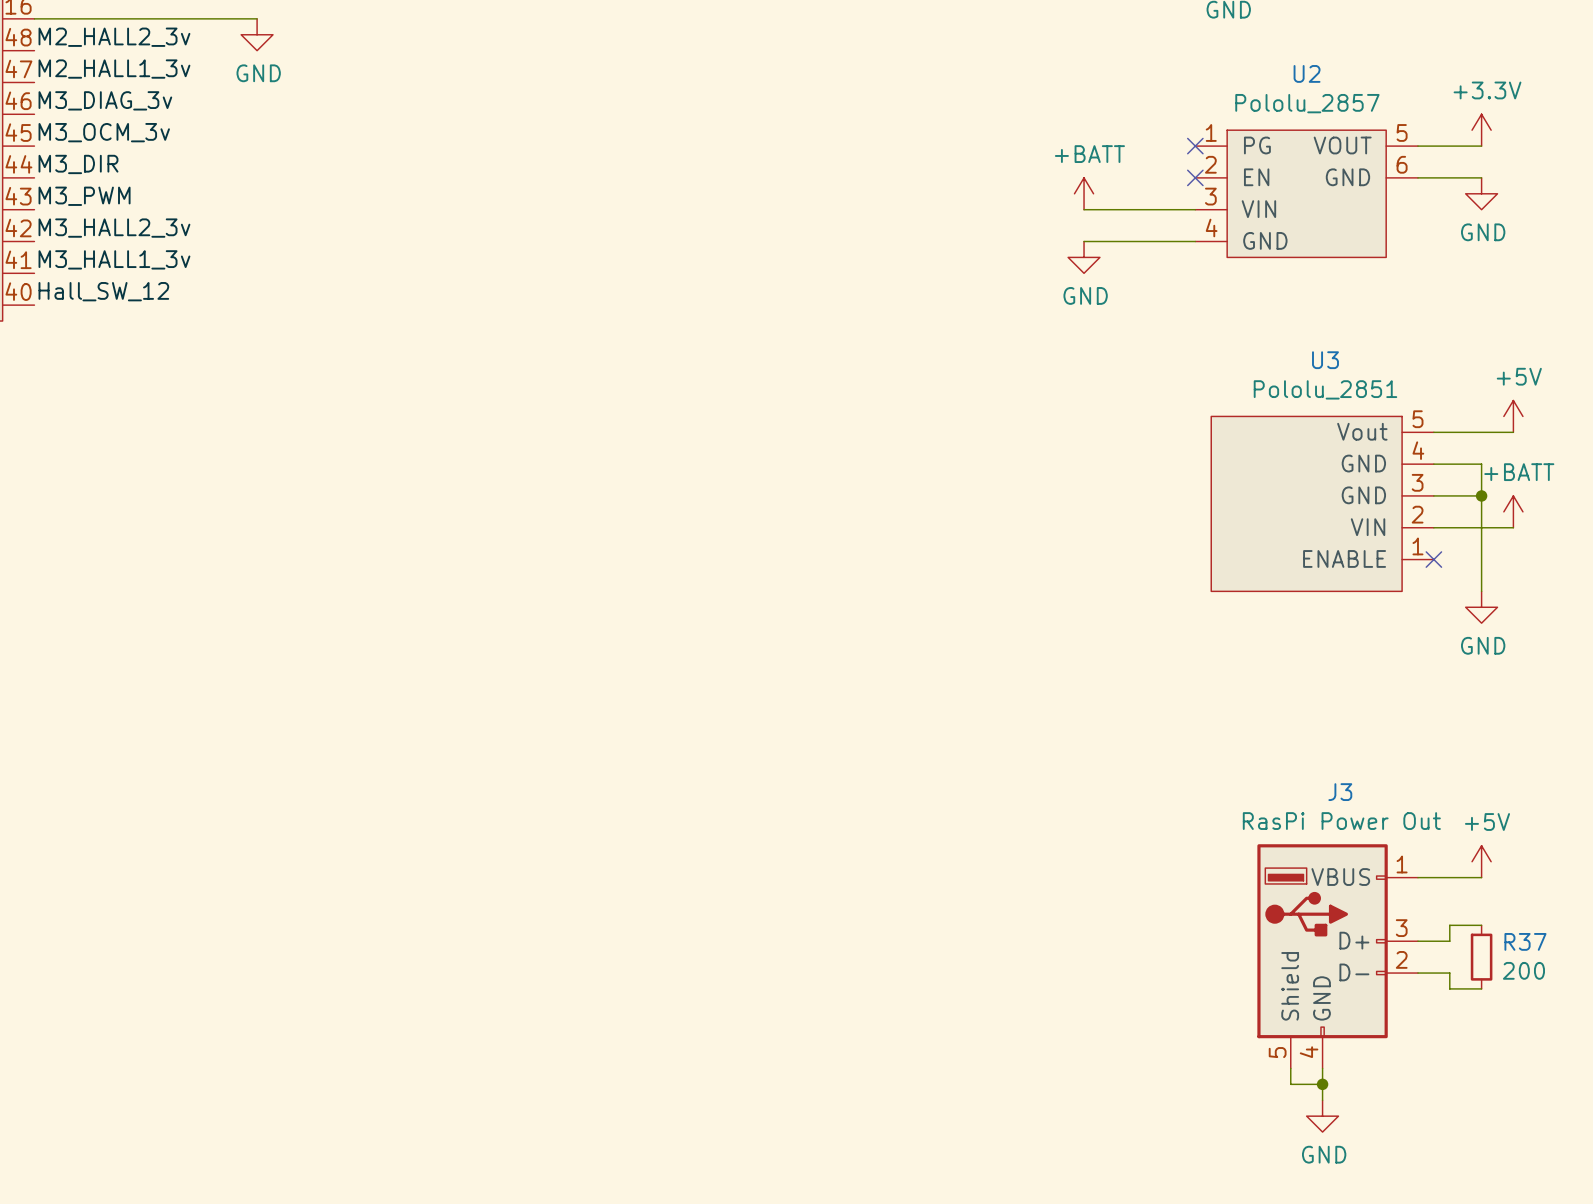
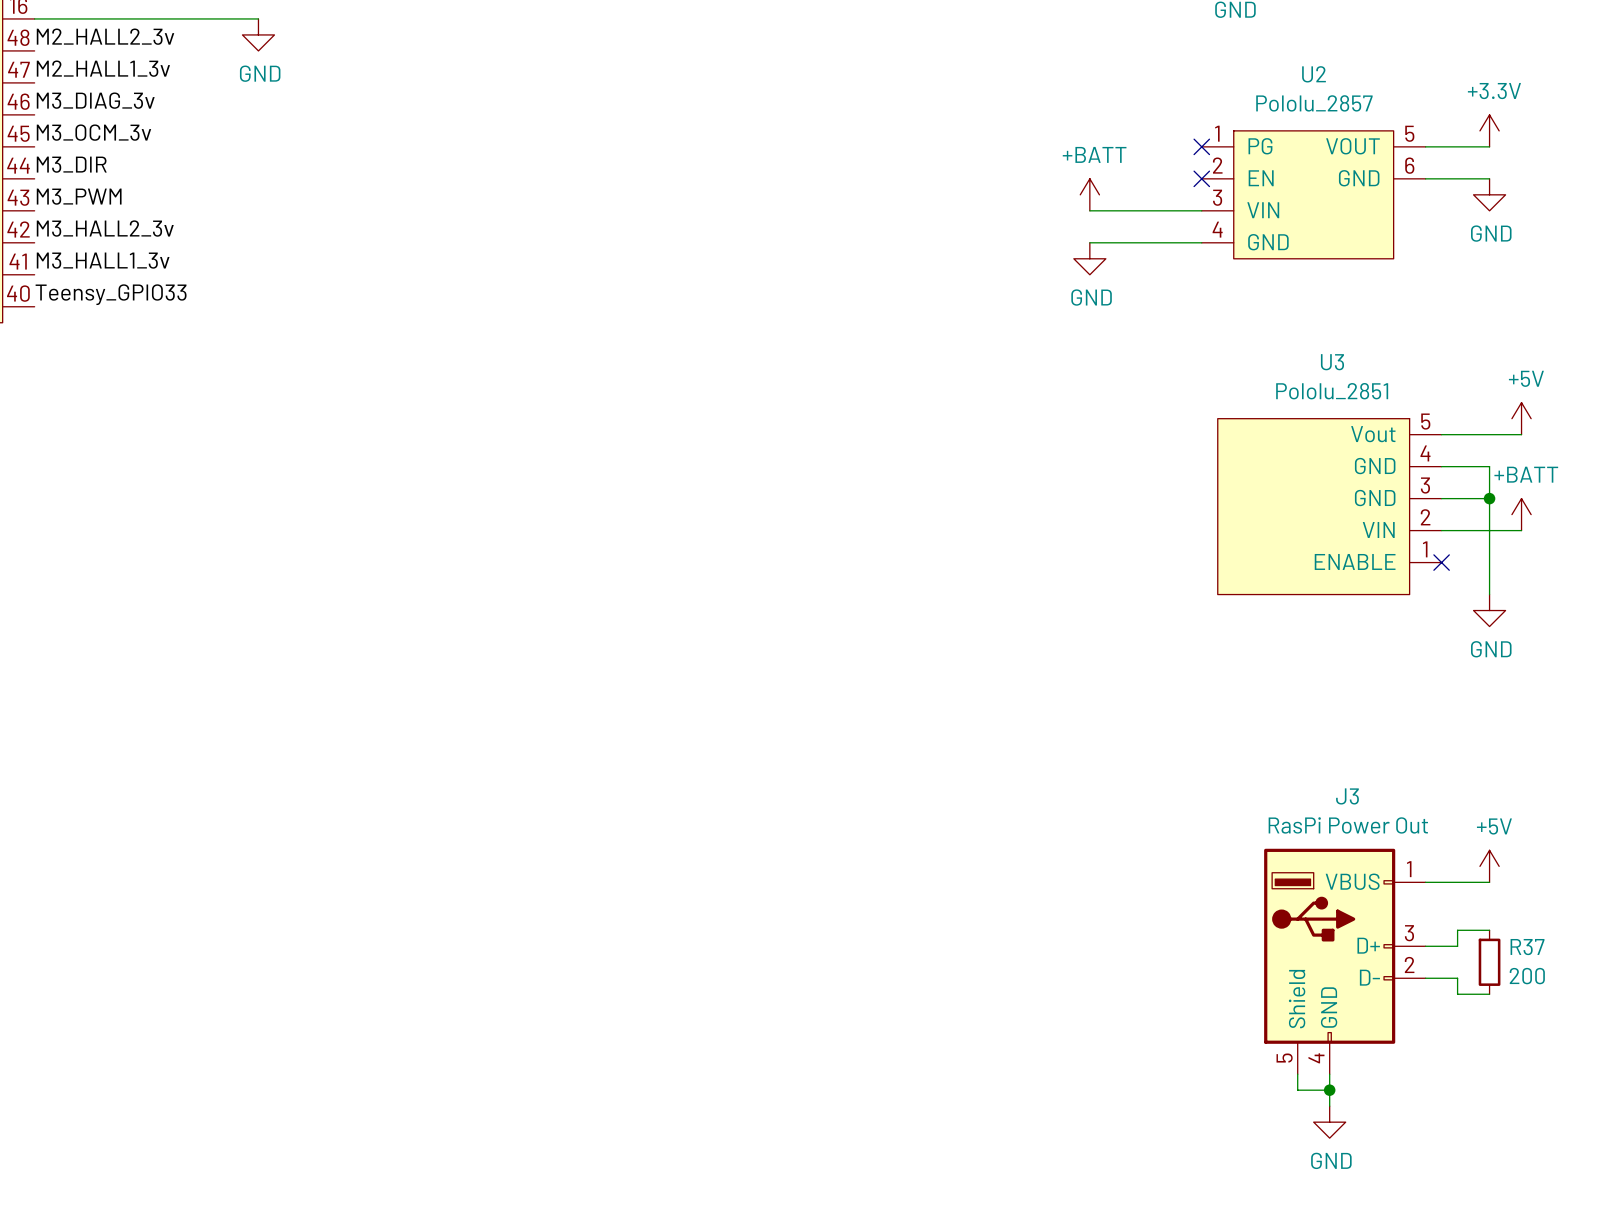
label: Hall_SW_12 (103, 291) -> Teensy_GPIO33 (111, 294)

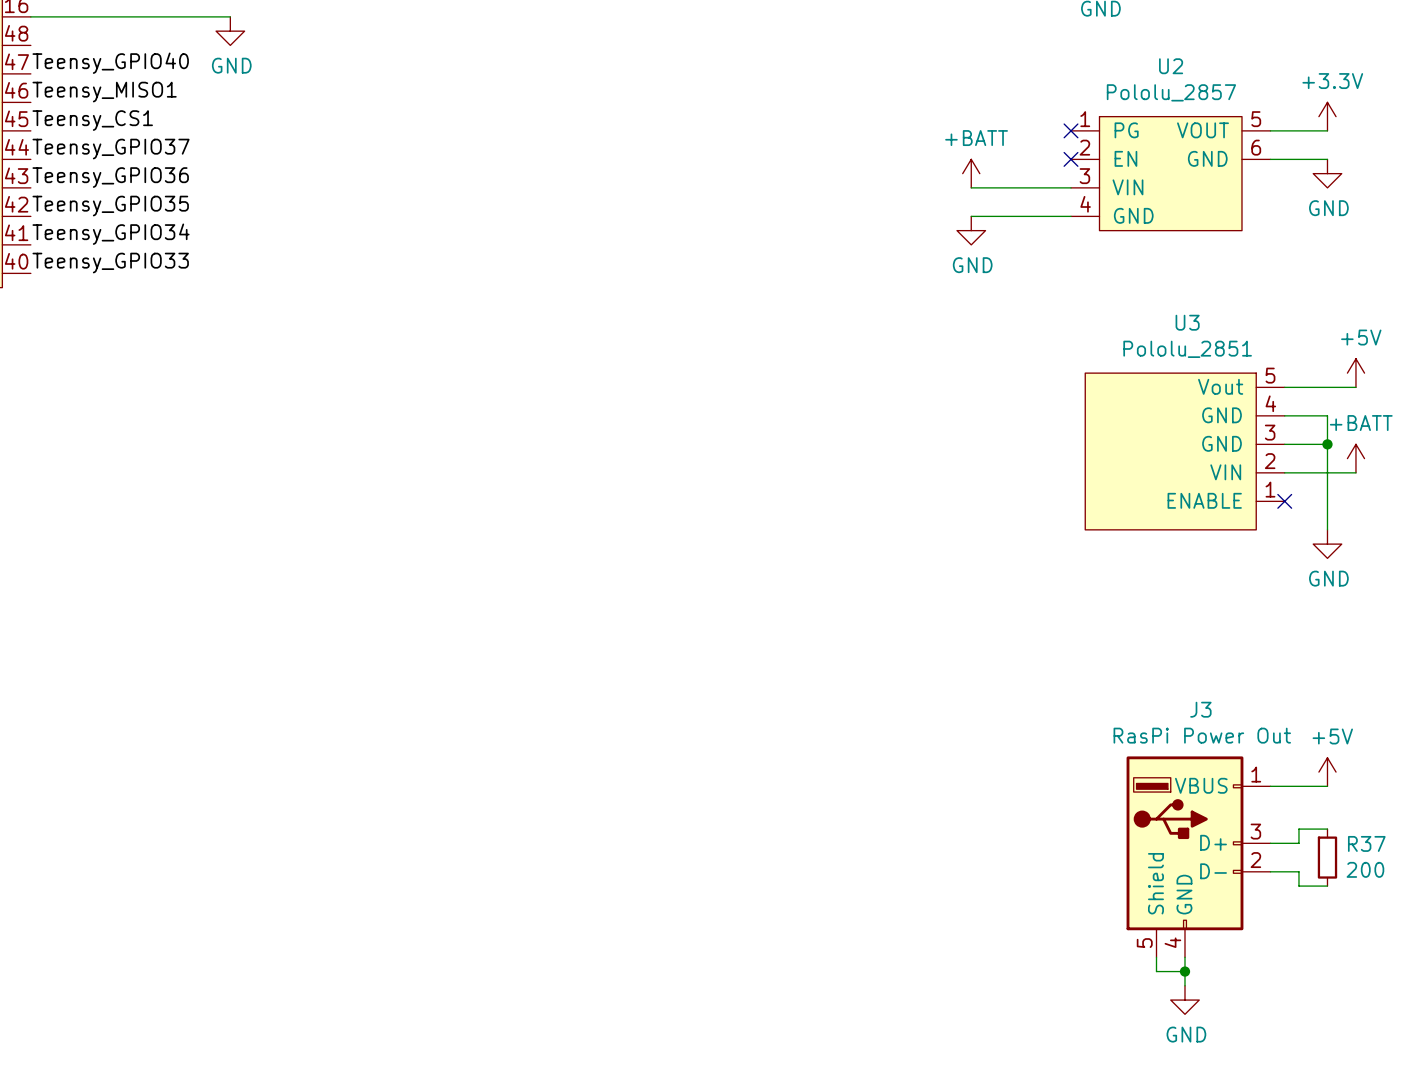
label: M2_HALL2_3v (105, 36) -> none
label: M2_HALL1_3v (103, 68) -> Teensy_GPIO40 (110, 63)
label: M3_DIAG_3v (95, 100) -> Teensy_MISO1 (104, 92)
label: M3_OCM_3v (93, 132) -> Teensy_CS1 (92, 120)
label: M3_DIR (71, 164) -> Teensy_GPIO37 (111, 149)
label: M3_PWM (79, 196) -> Teensy_GPIO36 (110, 177)
label: M3_HALL2_3v (105, 228) -> Teensy_GPIO35 (110, 206)
label: M3_HALL1_3v (103, 260) -> Teensy_GPIO34 (111, 234)

